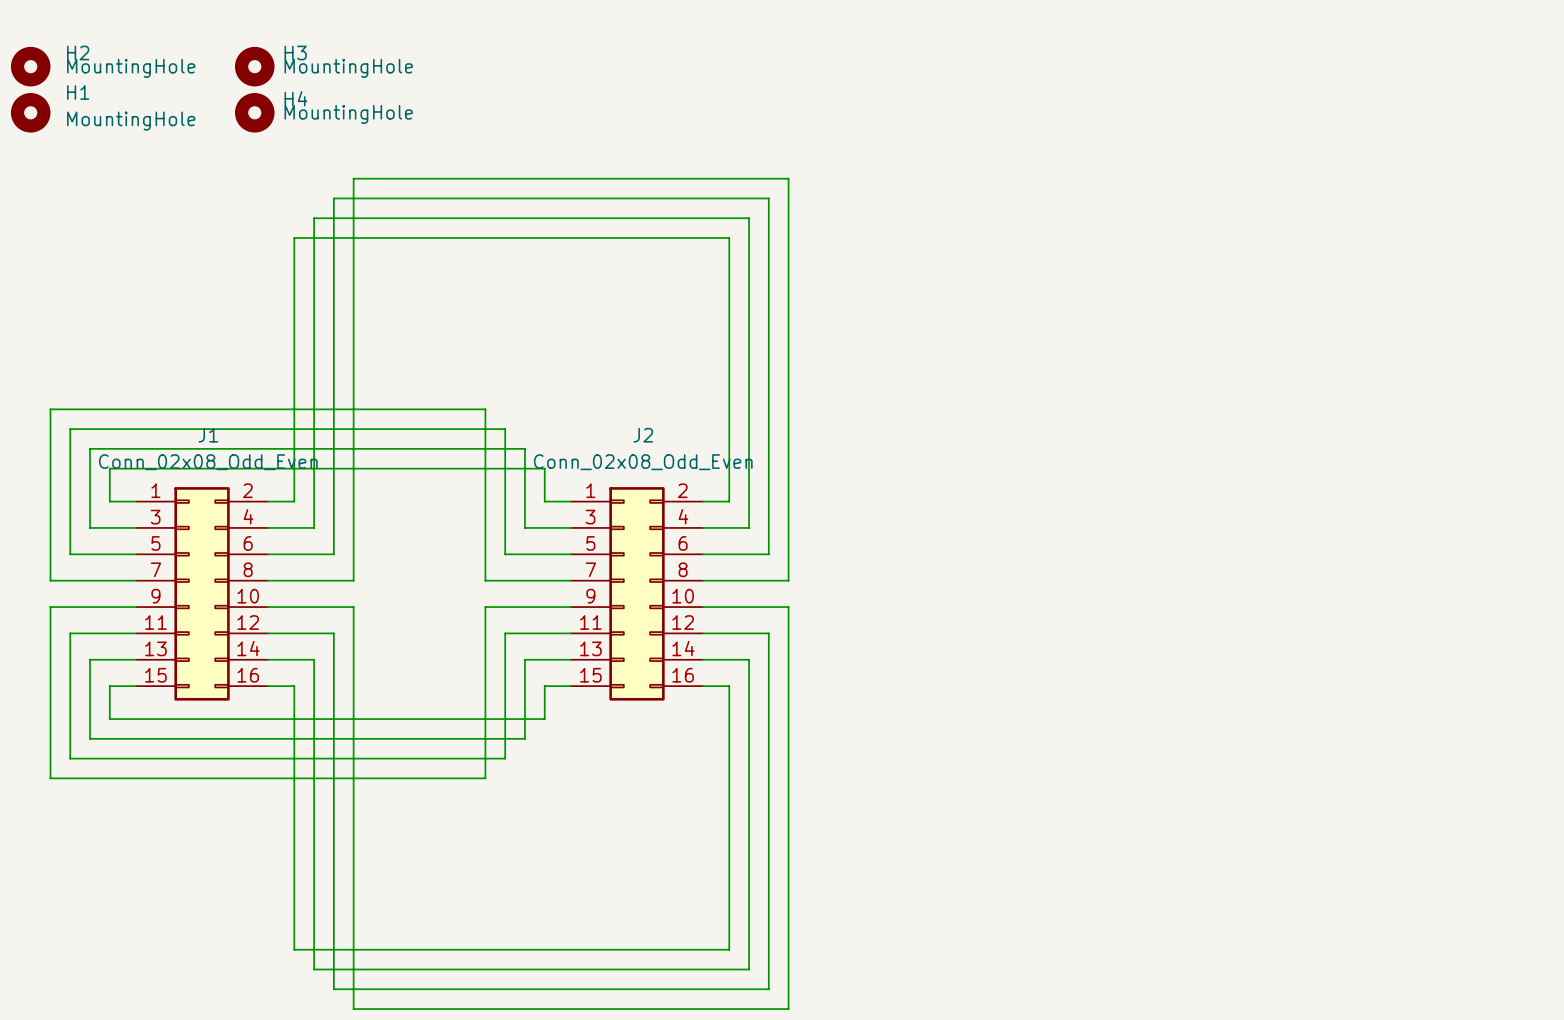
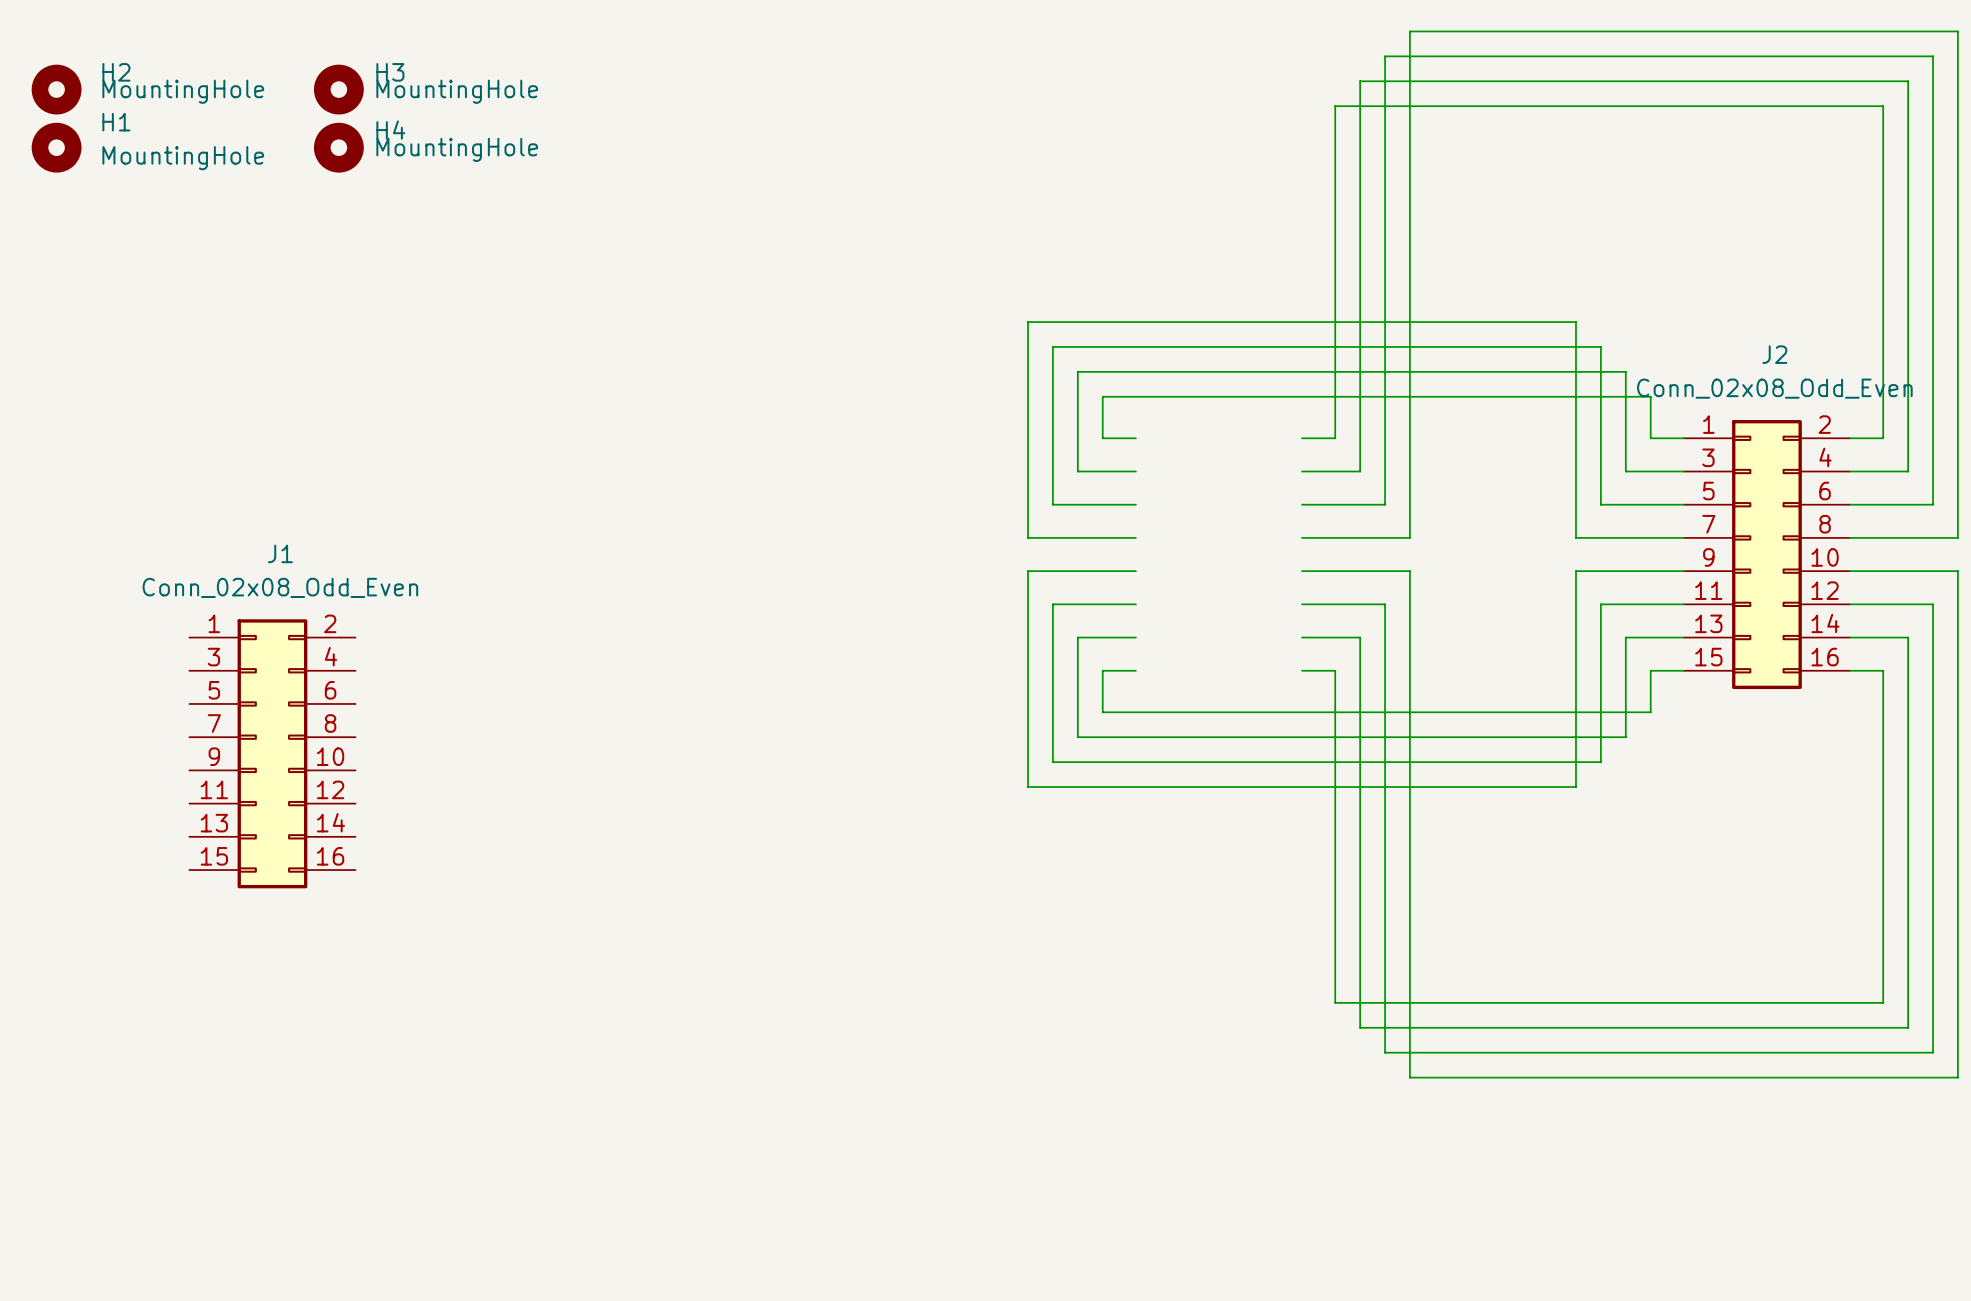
wire: none -> (1135, 438) (1102, 438) (1102, 396) (1650, 396) (1650, 438) (1683, 438)
wire: none -> (1302, 438) (1335, 438) (1335, 106) (1883, 106) (1883, 438) (1849, 438)
wire: none -> (1135, 471) (1077, 471) (1077, 371) (1625, 371) (1625, 471) (1683, 471)
wire: none -> (1302, 471) (1360, 471) (1360, 81) (1908, 81) (1908, 471) (1849, 471)
wire: none -> (1135, 504) (1052, 504) (1052, 346) (1600, 346) (1600, 504) (1683, 504)
wire: none -> (1302, 504) (1385, 504) (1385, 56) (1933, 56) (1933, 504) (1849, 504)
wire: none -> (1135, 537) (1028, 537) (1028, 322) (1575, 322) (1575, 537) (1683, 537)
wire: none -> (1302, 537) (1409, 537) (1409, 31) (1957, 31) (1957, 537) (1849, 537)
wire: none -> (1135, 571) (1028, 571) (1028, 787) (1575, 787) (1575, 571) (1683, 571)
wire: none -> (1302, 571) (1409, 571) (1409, 1077) (1957, 1077) (1957, 571) (1849, 571)
wire: none -> (1135, 604) (1052, 604) (1052, 762) (1600, 762) (1600, 604) (1683, 604)
wire: none -> (1302, 604) (1385, 604) (1385, 1052) (1933, 1052) (1933, 604) (1849, 604)
wire: (136, 501) (109, 501) (109, 468) (544, 468) (544, 501) (571, 501) -> none
wire: (267, 501) (294, 501) (294, 238) (729, 238) (729, 501) (702, 501) -> none
wire: none -> (1135, 637) (1077, 637) (1077, 737) (1625, 737) (1625, 637) (1683, 637)
wire: none -> (1302, 637) (1360, 637) (1360, 1027) (1908, 1027) (1908, 637) (1849, 637)
wire: (136, 527) (90, 527) (90, 448) (524, 448) (524, 527) (571, 527) -> none
wire: (267, 527) (314, 527) (314, 218) (749, 218) (749, 527) (702, 527) -> none
wire: none -> (1135, 670) (1102, 670) (1102, 712) (1650, 712) (1650, 670) (1683, 670)
wire: none -> (1302, 670) (1335, 670) (1335, 1002) (1883, 1002) (1883, 670) (1849, 670)
wire: (136, 554) (70, 554) (70, 429) (505, 429) (505, 554) (571, 554) -> none
wire: (267, 554) (333, 554) (333, 198) (768, 198) (768, 554) (702, 554) -> none
wire: (136, 580) (50, 580) (50, 409) (485, 409) (485, 580) (571, 580) -> none
wire: (267, 580) (353, 580) (353, 178) (788, 178) (788, 580) (702, 580) -> none
J2 position: (636, 593) -> (1766, 554)
wire: (136, 607) (50, 607) (50, 778) (485, 778) (485, 607) (571, 607) -> none
wire: (267, 607) (353, 607) (353, 1009) (788, 1009) (788, 607) (702, 607) -> none
wire: (136, 633) (70, 633) (70, 758) (505, 758) (505, 633) (571, 633) -> none
wire: (267, 633) (333, 633) (333, 989) (768, 989) (768, 633) (702, 633) -> none
wire: (136, 659) (90, 659) (90, 738) (524, 738) (524, 659) (571, 659) -> none
wire: (267, 659) (314, 659) (314, 969) (749, 969) (749, 659) (702, 659) -> none
wire: (136, 686) (109, 686) (109, 719) (544, 719) (544, 686) (571, 686) -> none
wire: (267, 686) (294, 686) (294, 949) (729, 949) (729, 686) (702, 686) -> none

